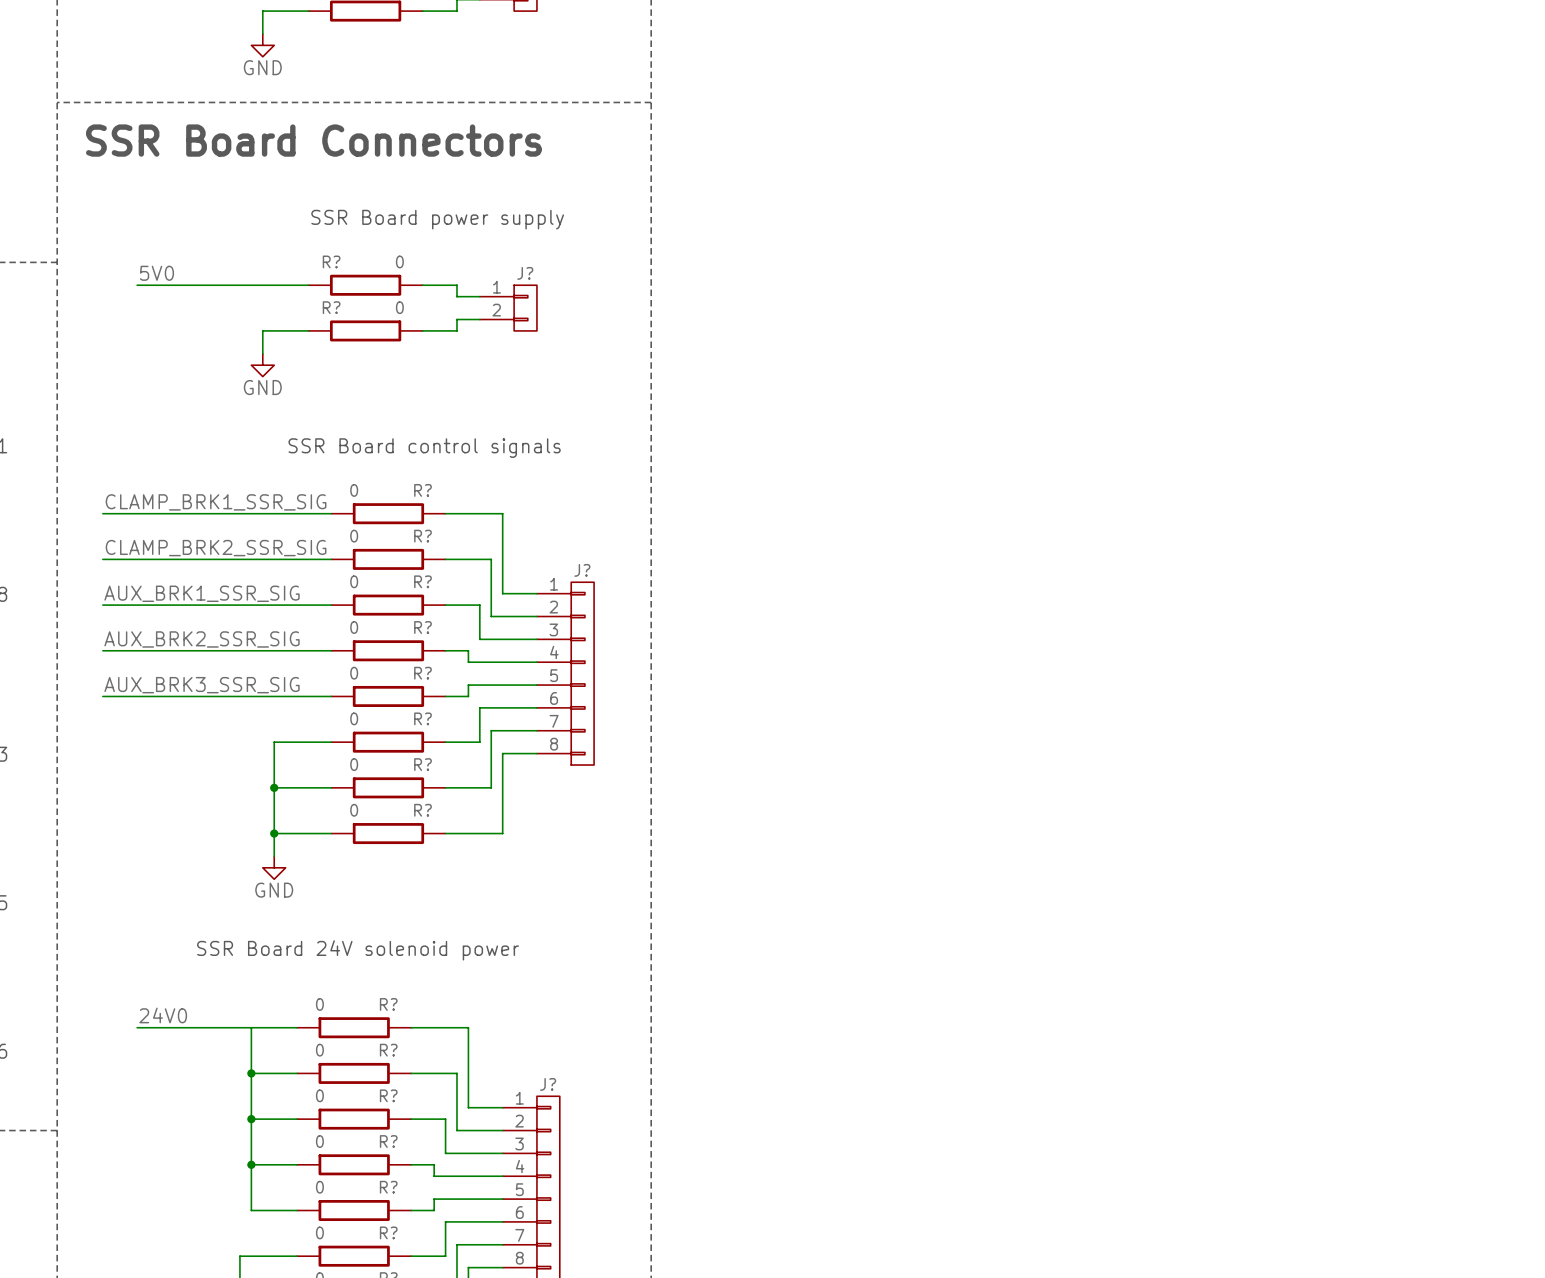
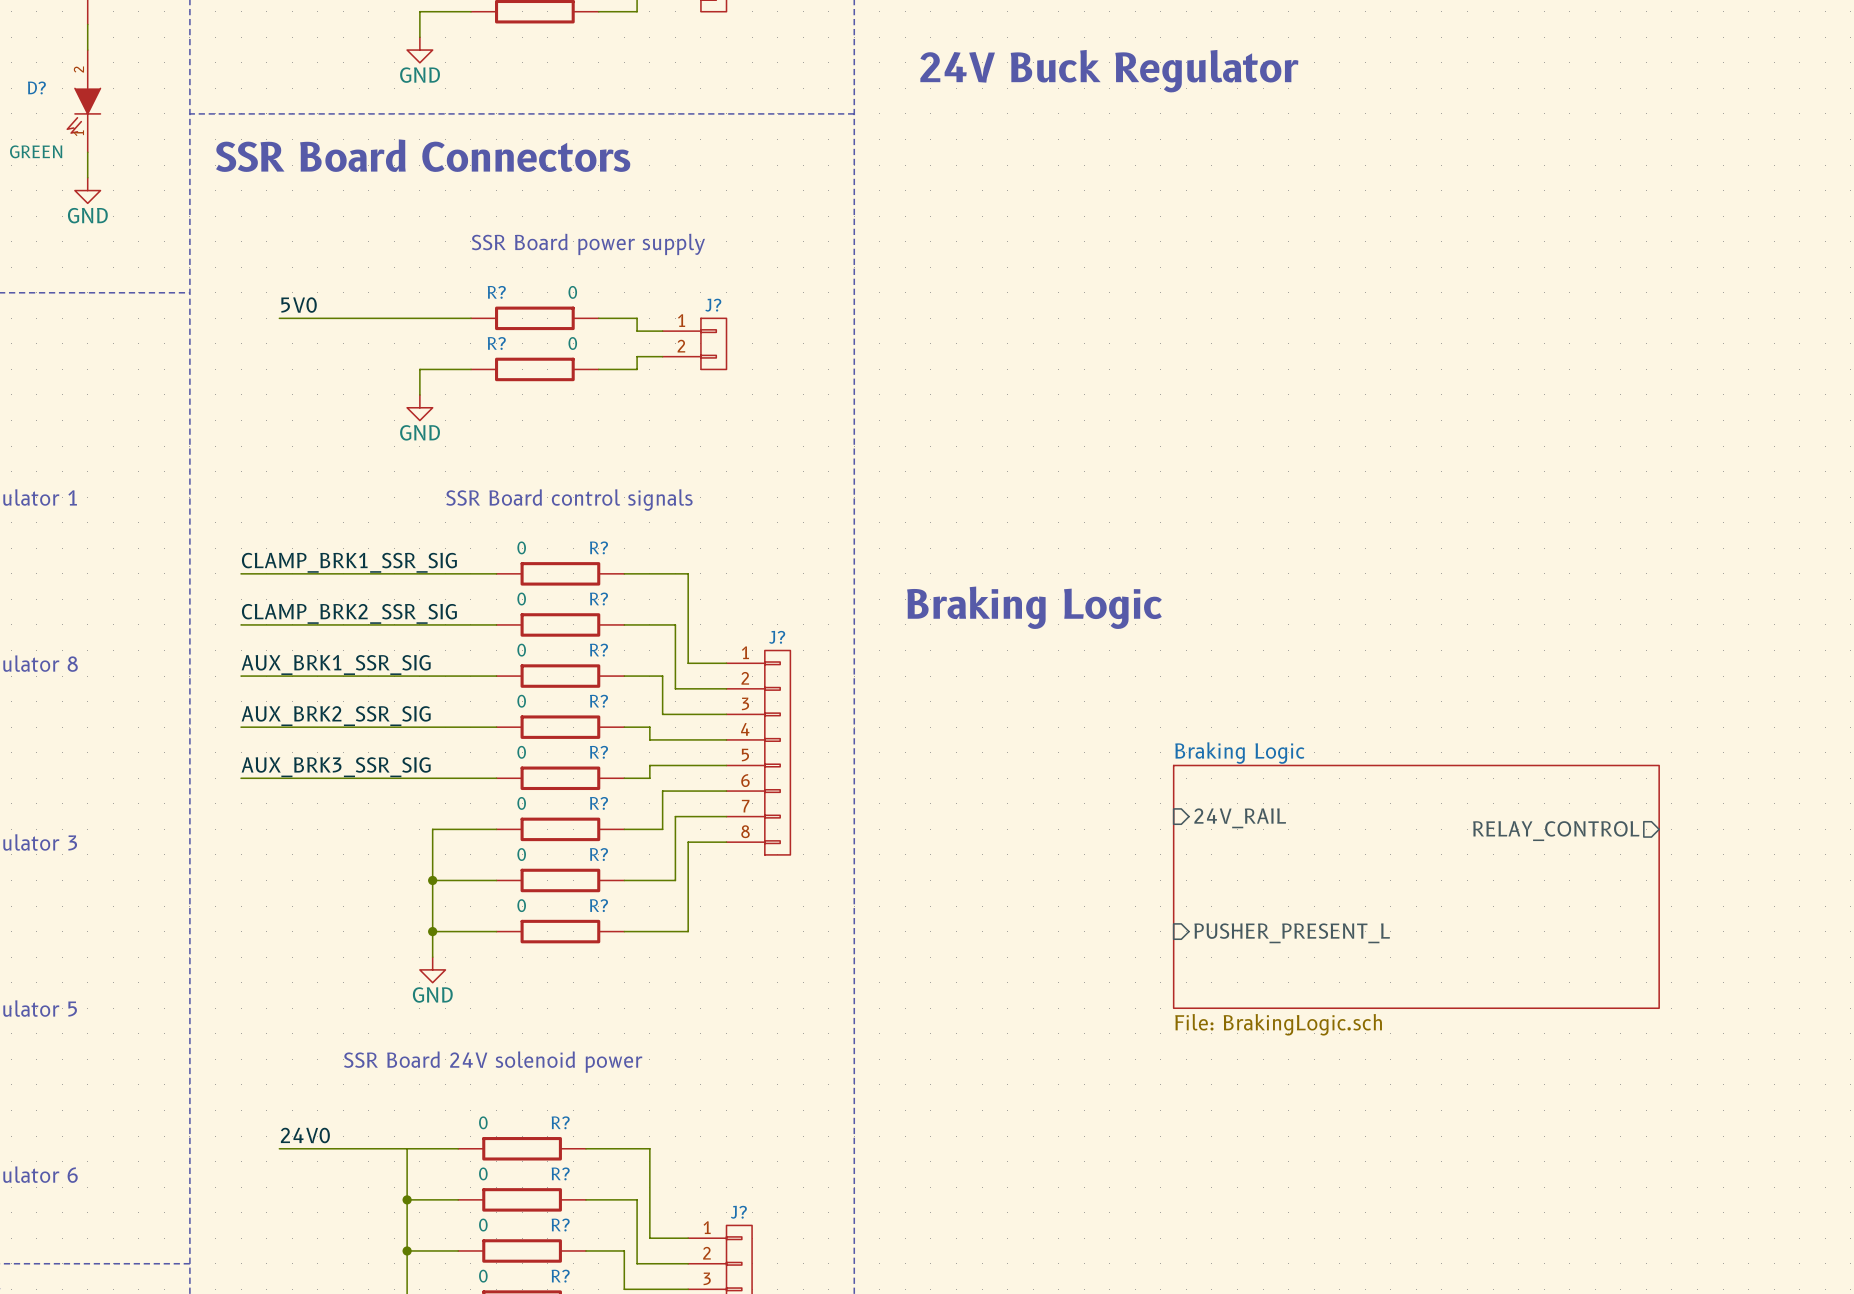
text: none -> 24V Buck Regulator (1109, 71)
text: none -> Braking Logic (1034, 607)
sheet pin: none -> 24V_RAIL (1240, 818)
sheet pin: none -> RELAY_CONTROL (1556, 831)
sheet Braking Logic: none -> File: BrakingLogic.sch (1416, 886)
sheet pin: none -> PUSHER_PRESENT_L (1292, 933)

